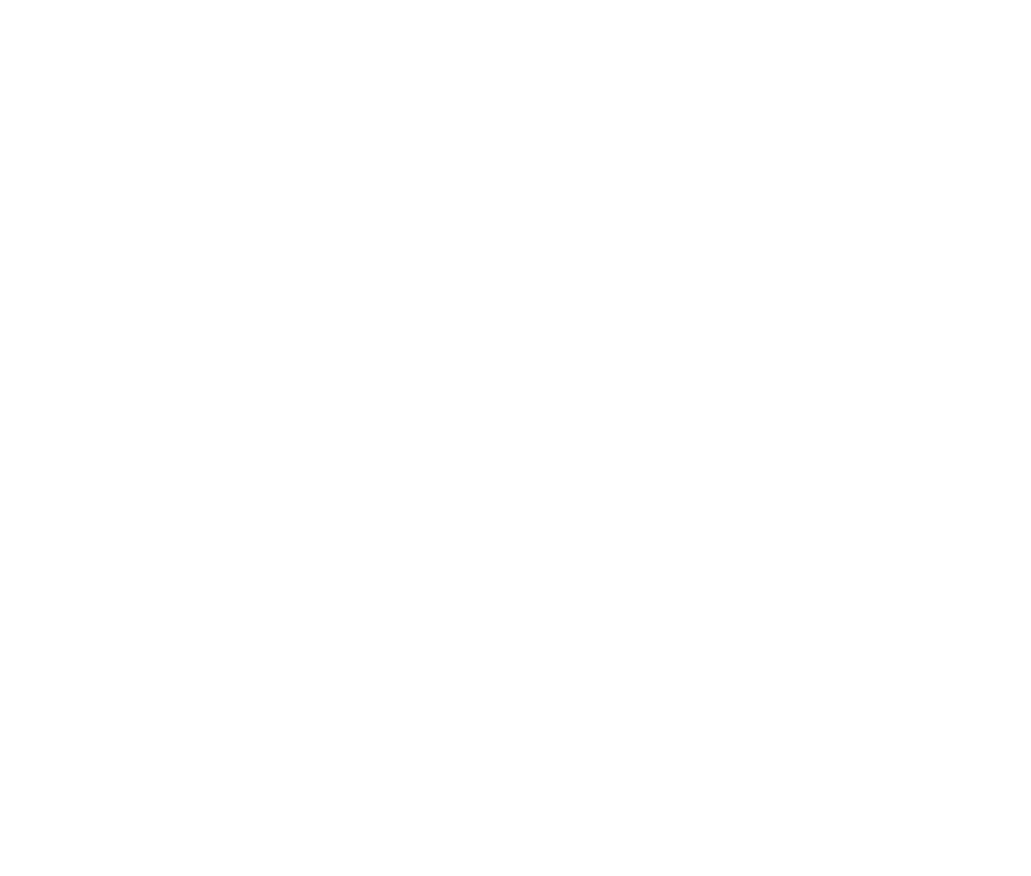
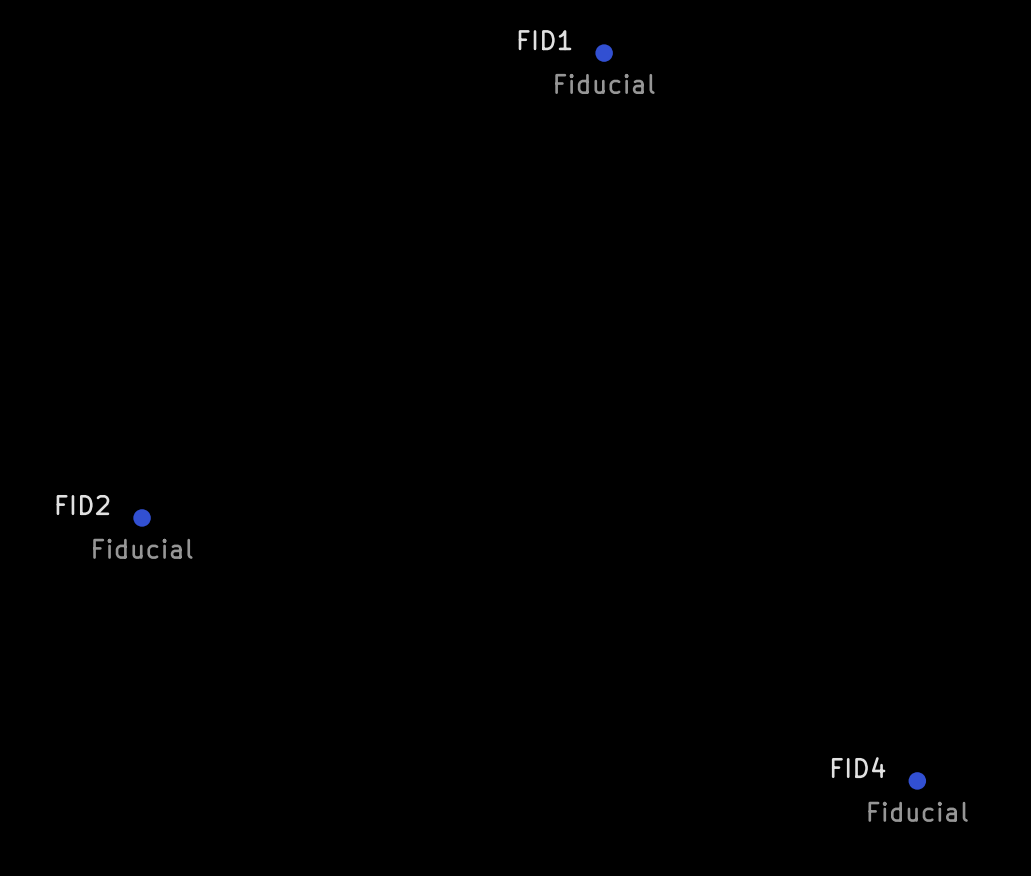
FID1: none -> Fiducial (604, 53)
FID2: none -> Fiducial (142, 517)
FID4: none -> Fiducial (917, 780)

